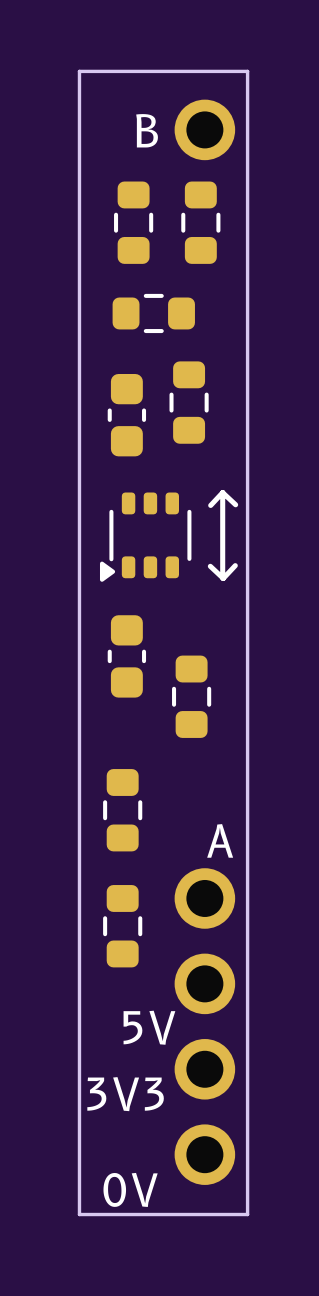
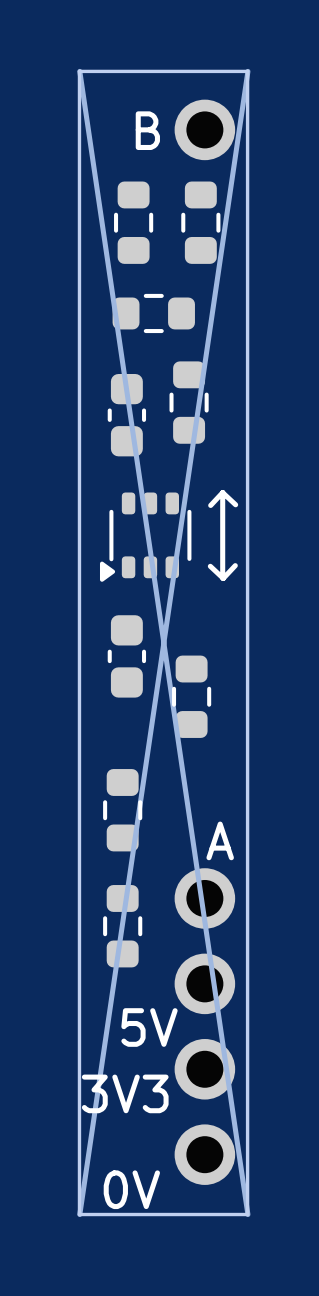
line: none -> (79, 71) (247, 1214)
line: none -> (247, 71) (79, 1214)

